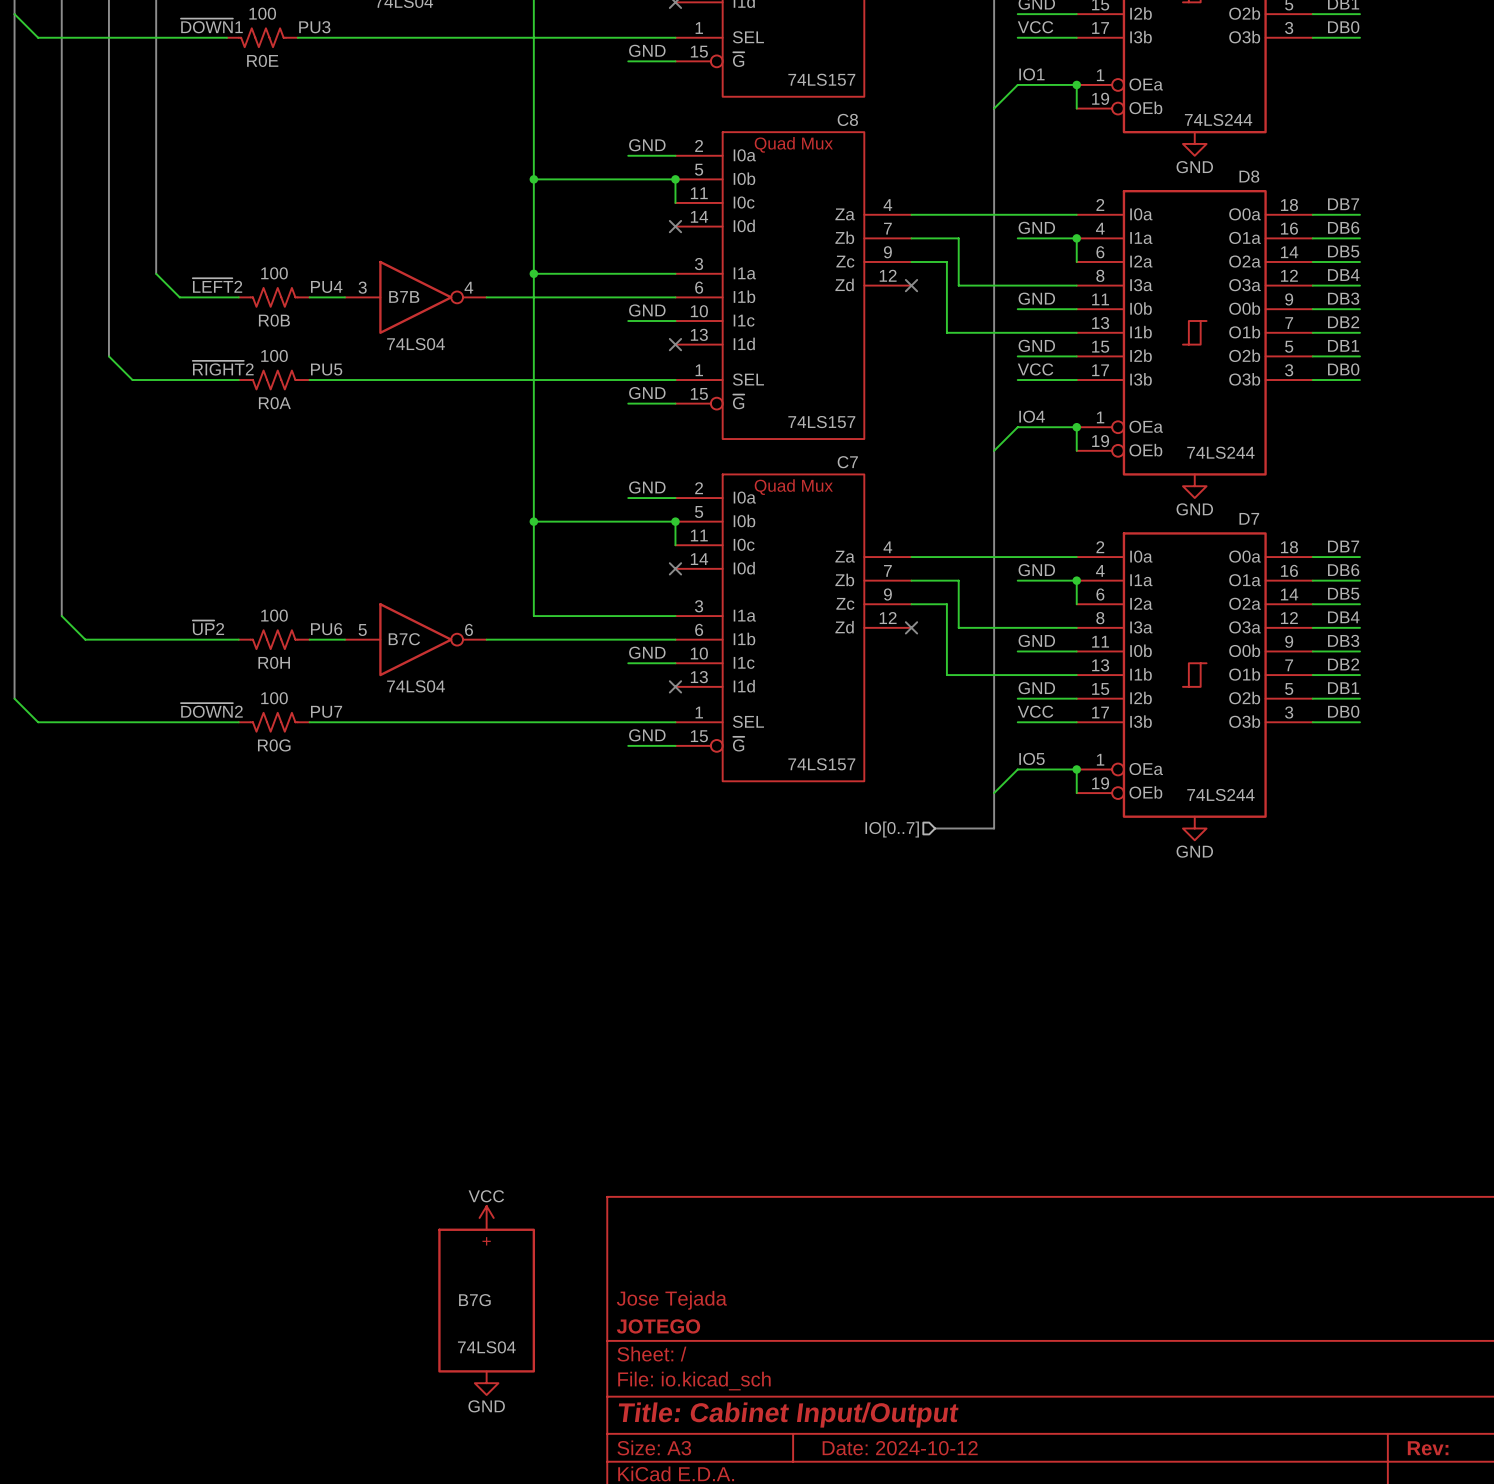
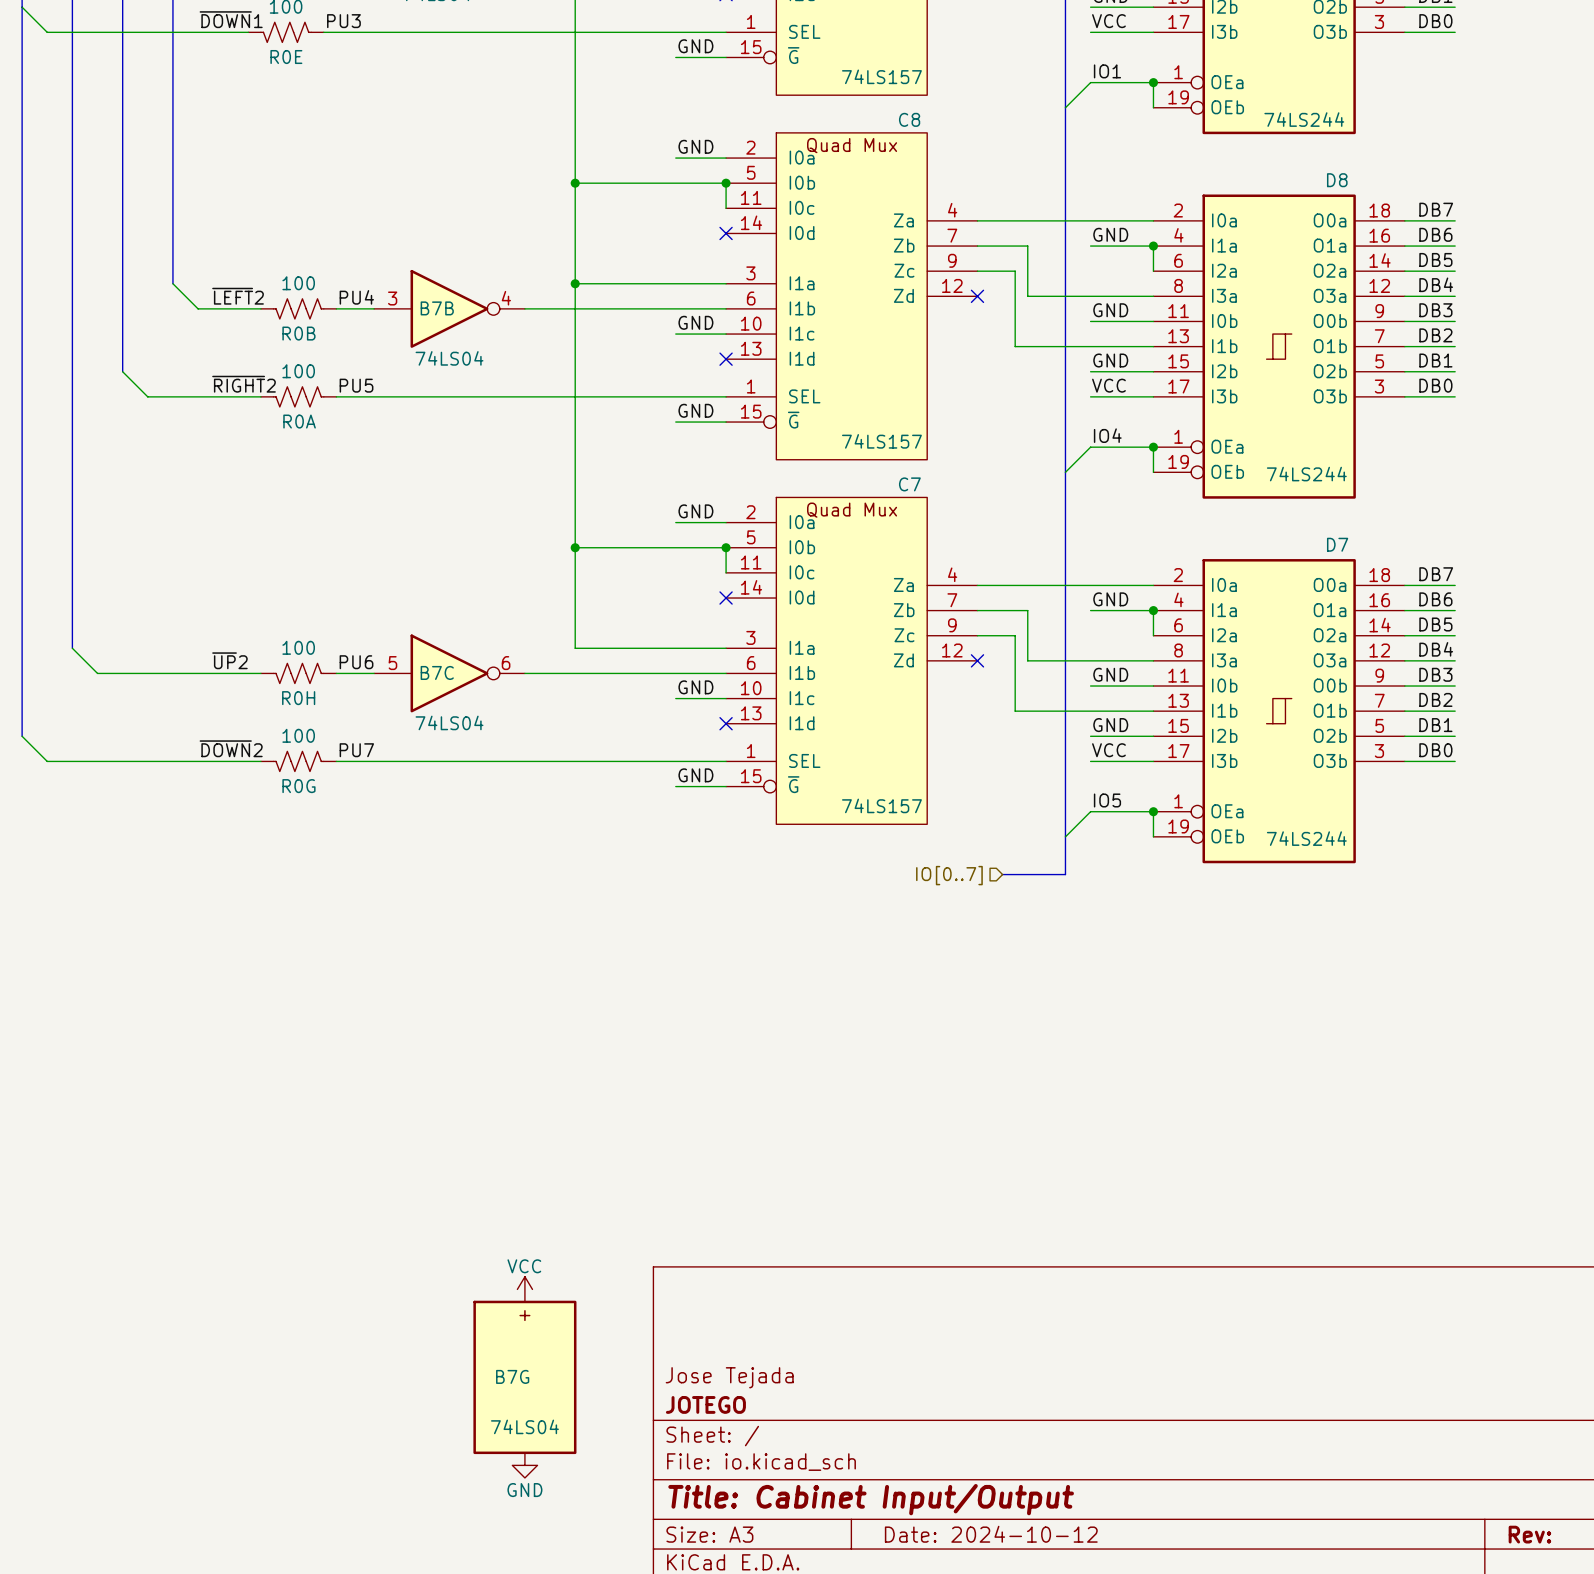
power symbol: GND (1194, 143) -> none
power symbol: GND (1194, 486) -> none
power symbol: GND (1194, 828) -> none

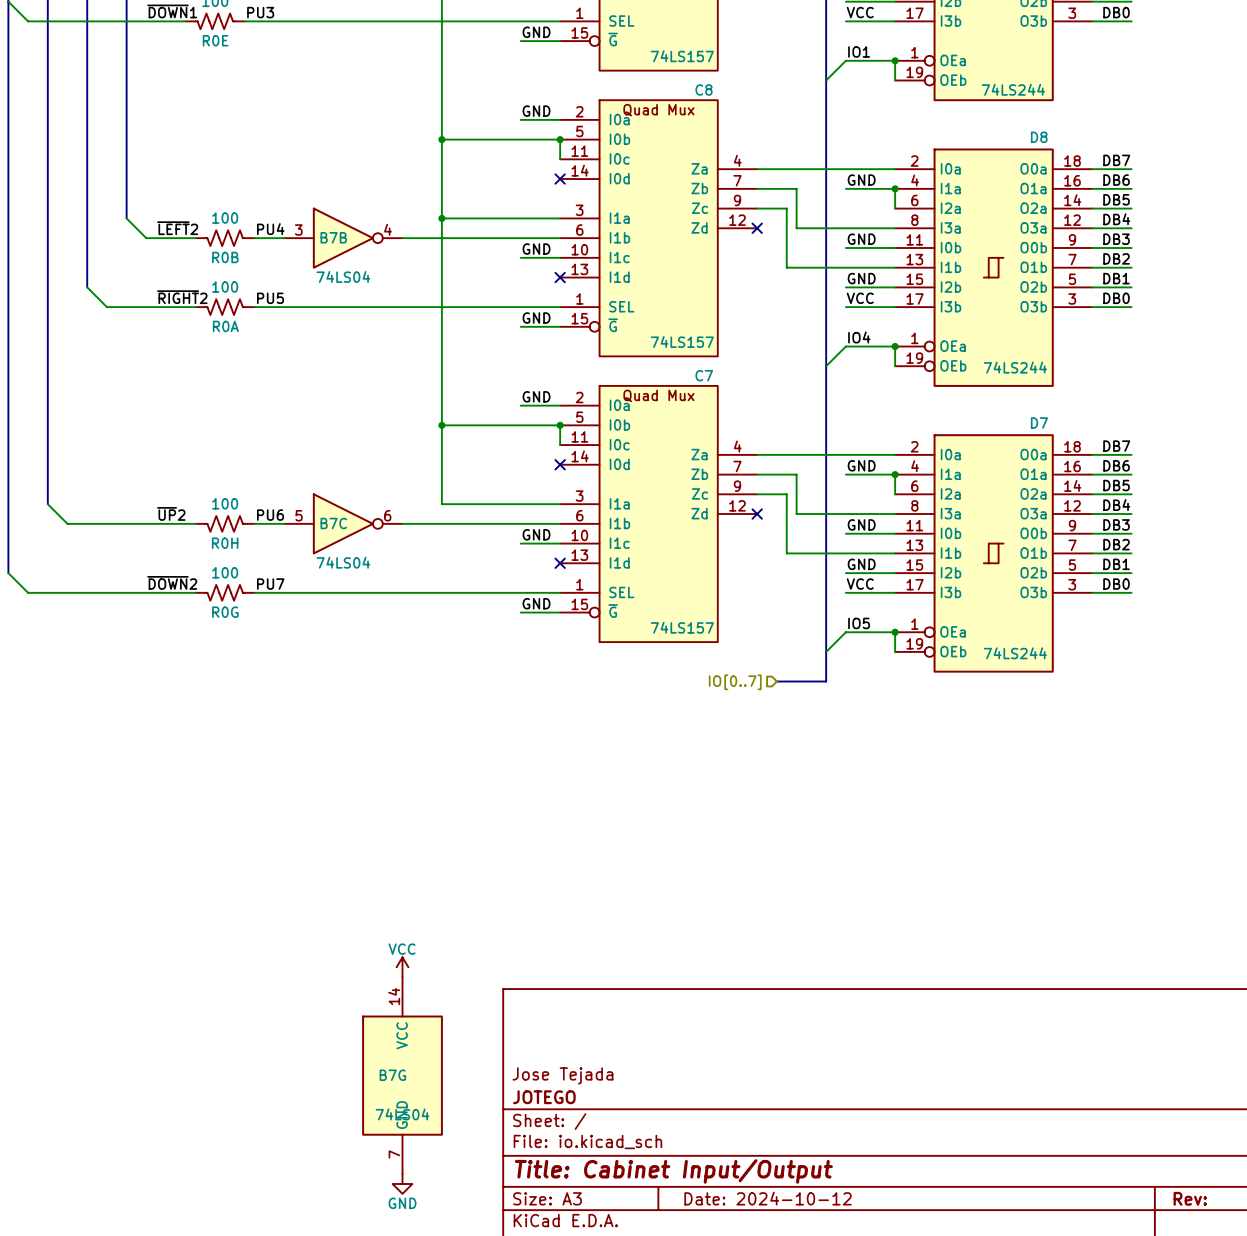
power symbol position: VCC (524, 1289) -> VCC (402, 967)
B7G symbol: [473, 1300, 577, 1455] -> [362, 977, 443, 1175]
power symbol position: GND (524, 1465) -> GND (402, 1184)

